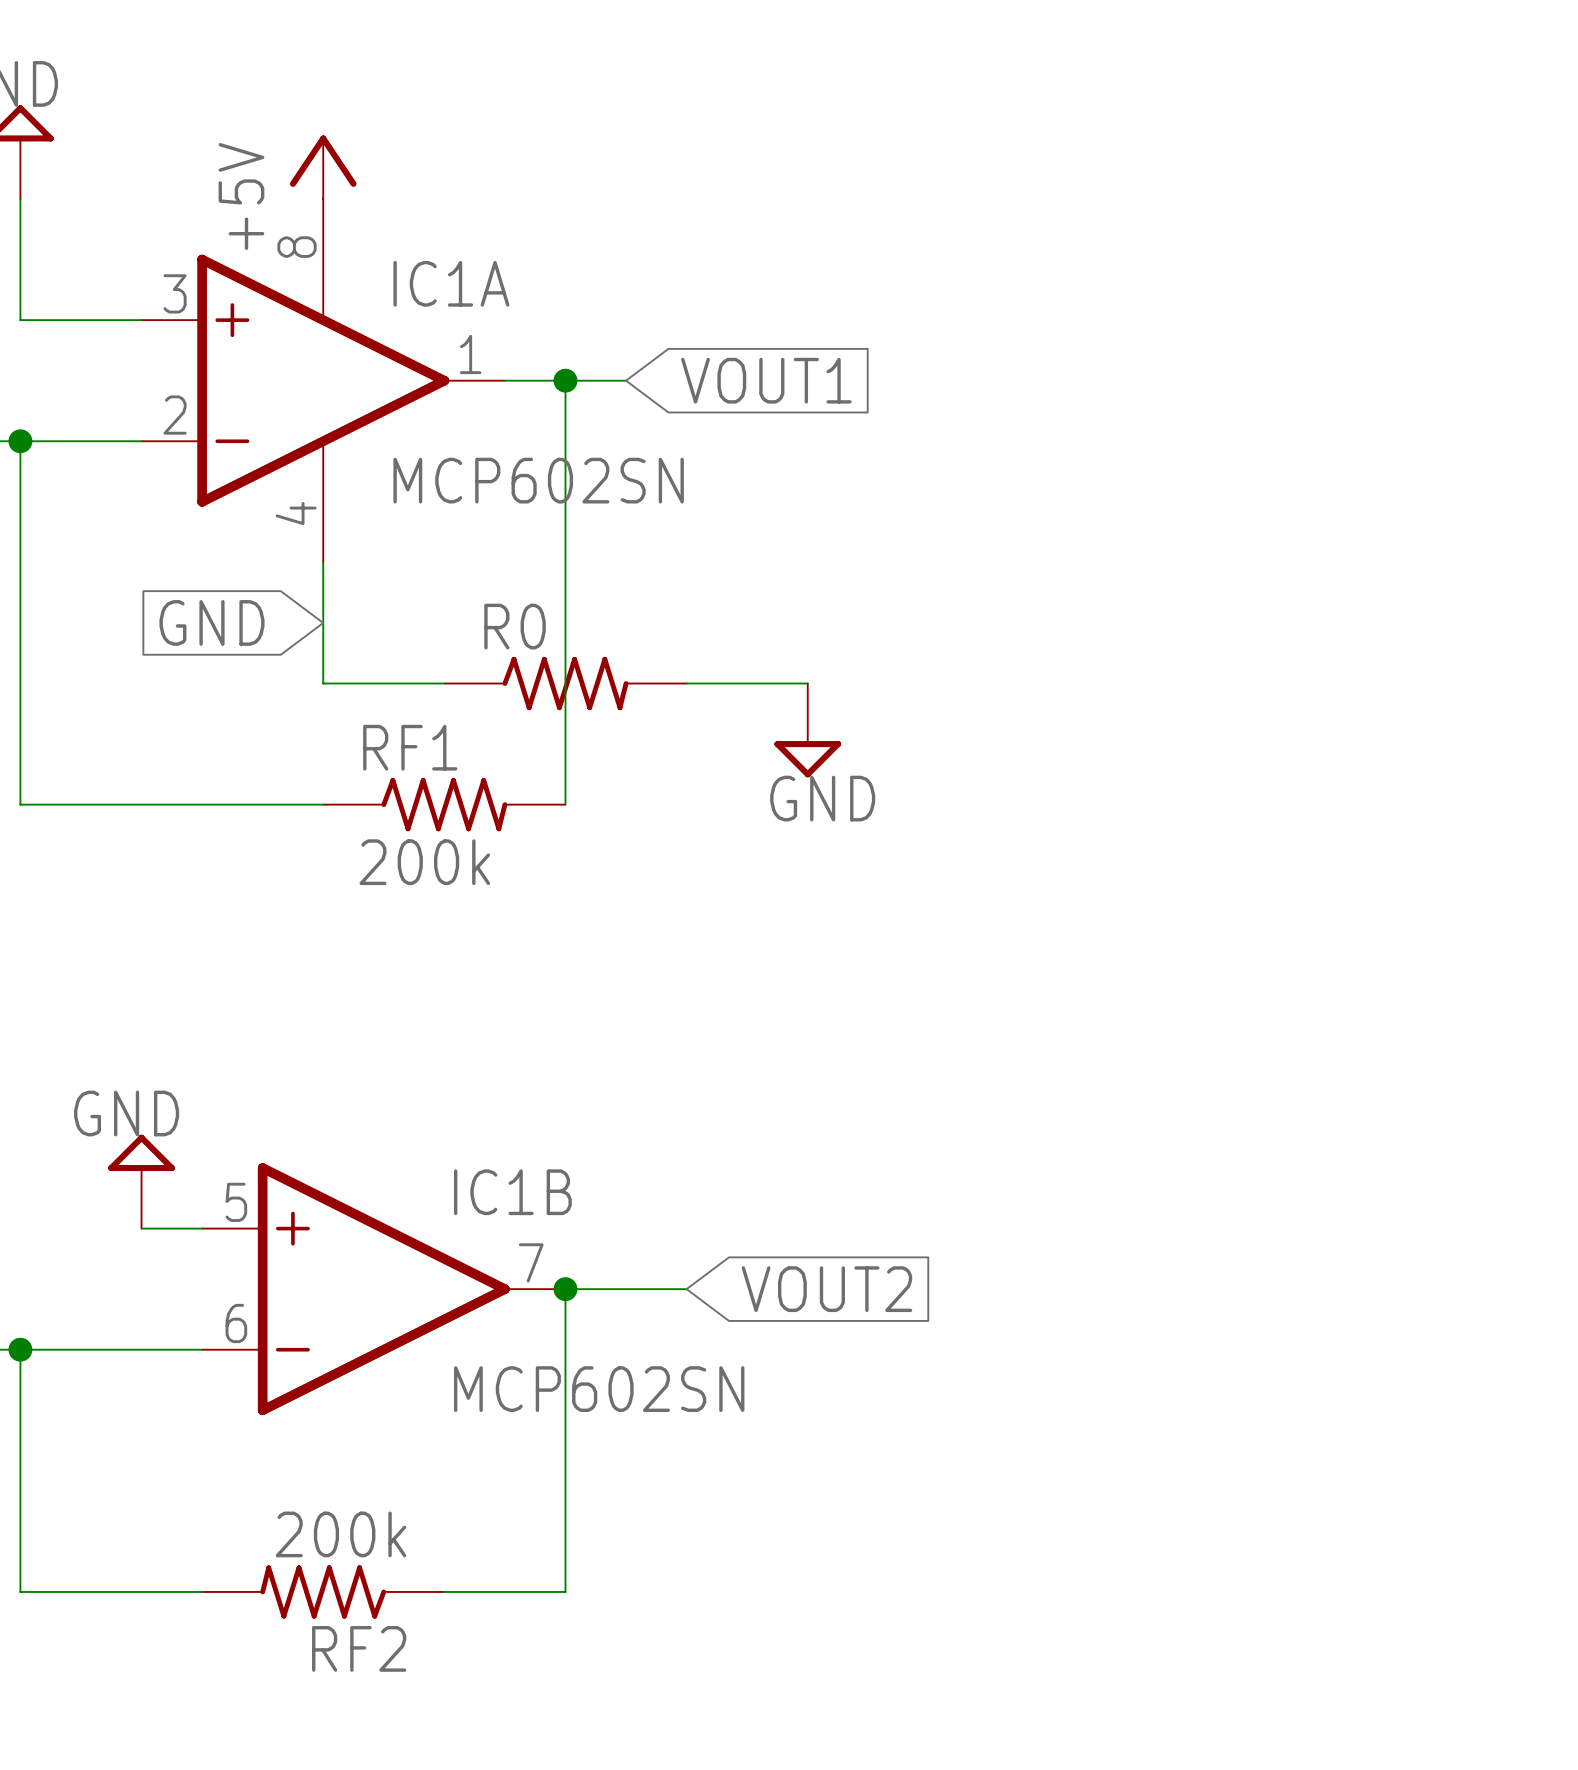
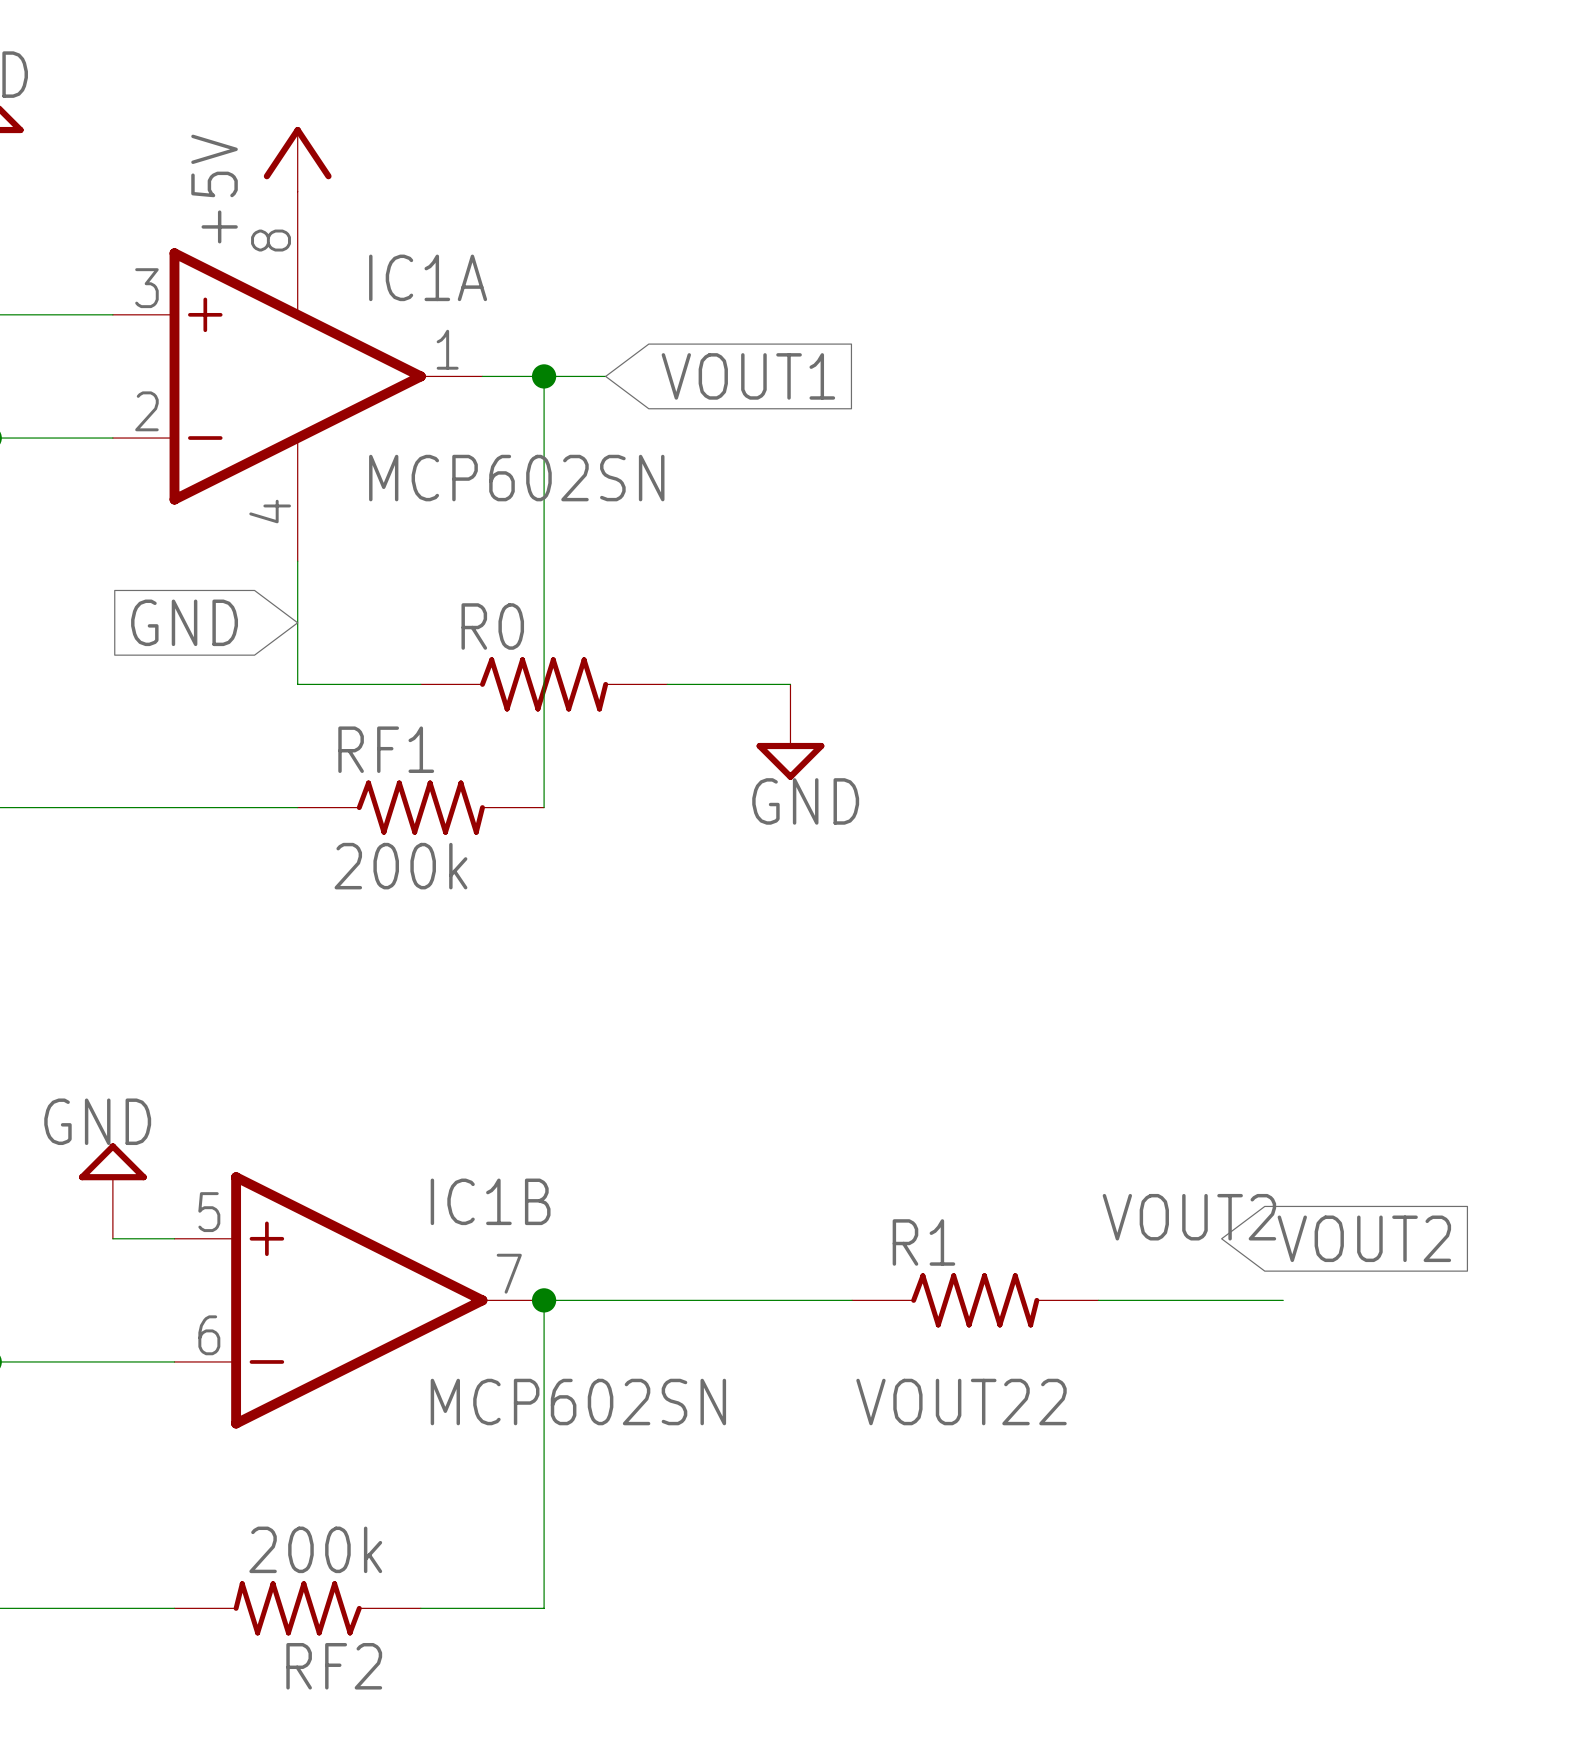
label: none -> VOUT2 (1189, 1217)
wire: none -> (667, 1300) (852, 1300)
global label position: VOUT2 (826, 1289) -> VOUT2 (1364, 1238)
R1: none -> (975, 1300)
wire: none -> (1098, 1300) (1283, 1300)
label: none -> VOUT22 (961, 1402)

